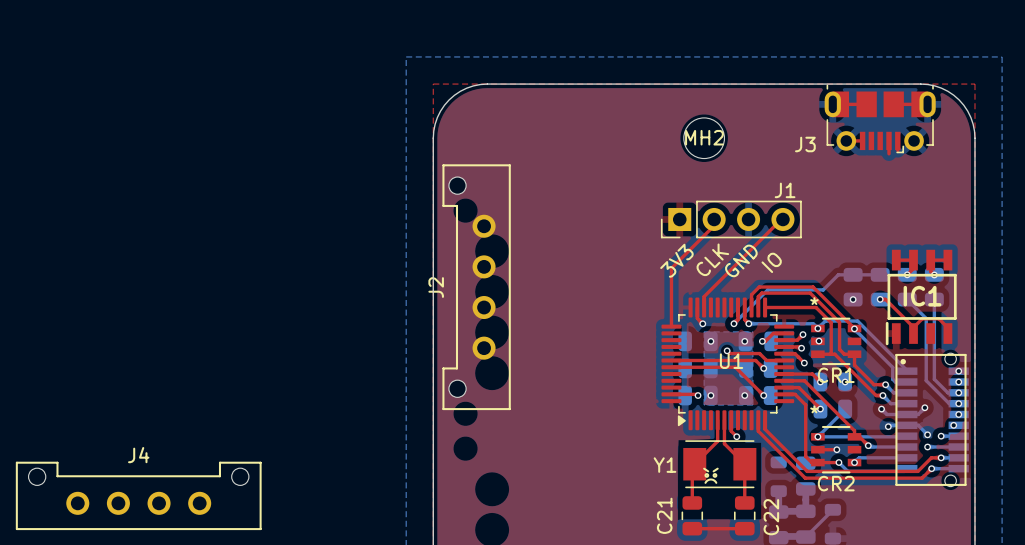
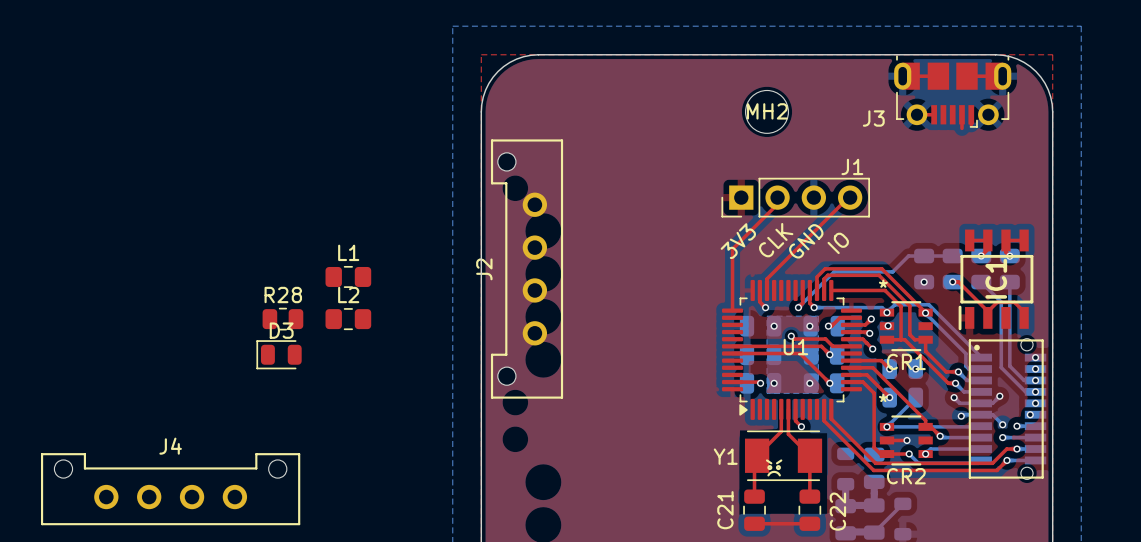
L1: none -> (348, 276)
IC1 name rotation: 0° (922, 296) -> 90° counterclockwise (996, 278)
R28: none -> (282, 319)
L2: none -> (348, 319)
D3: none -> (279, 354)

